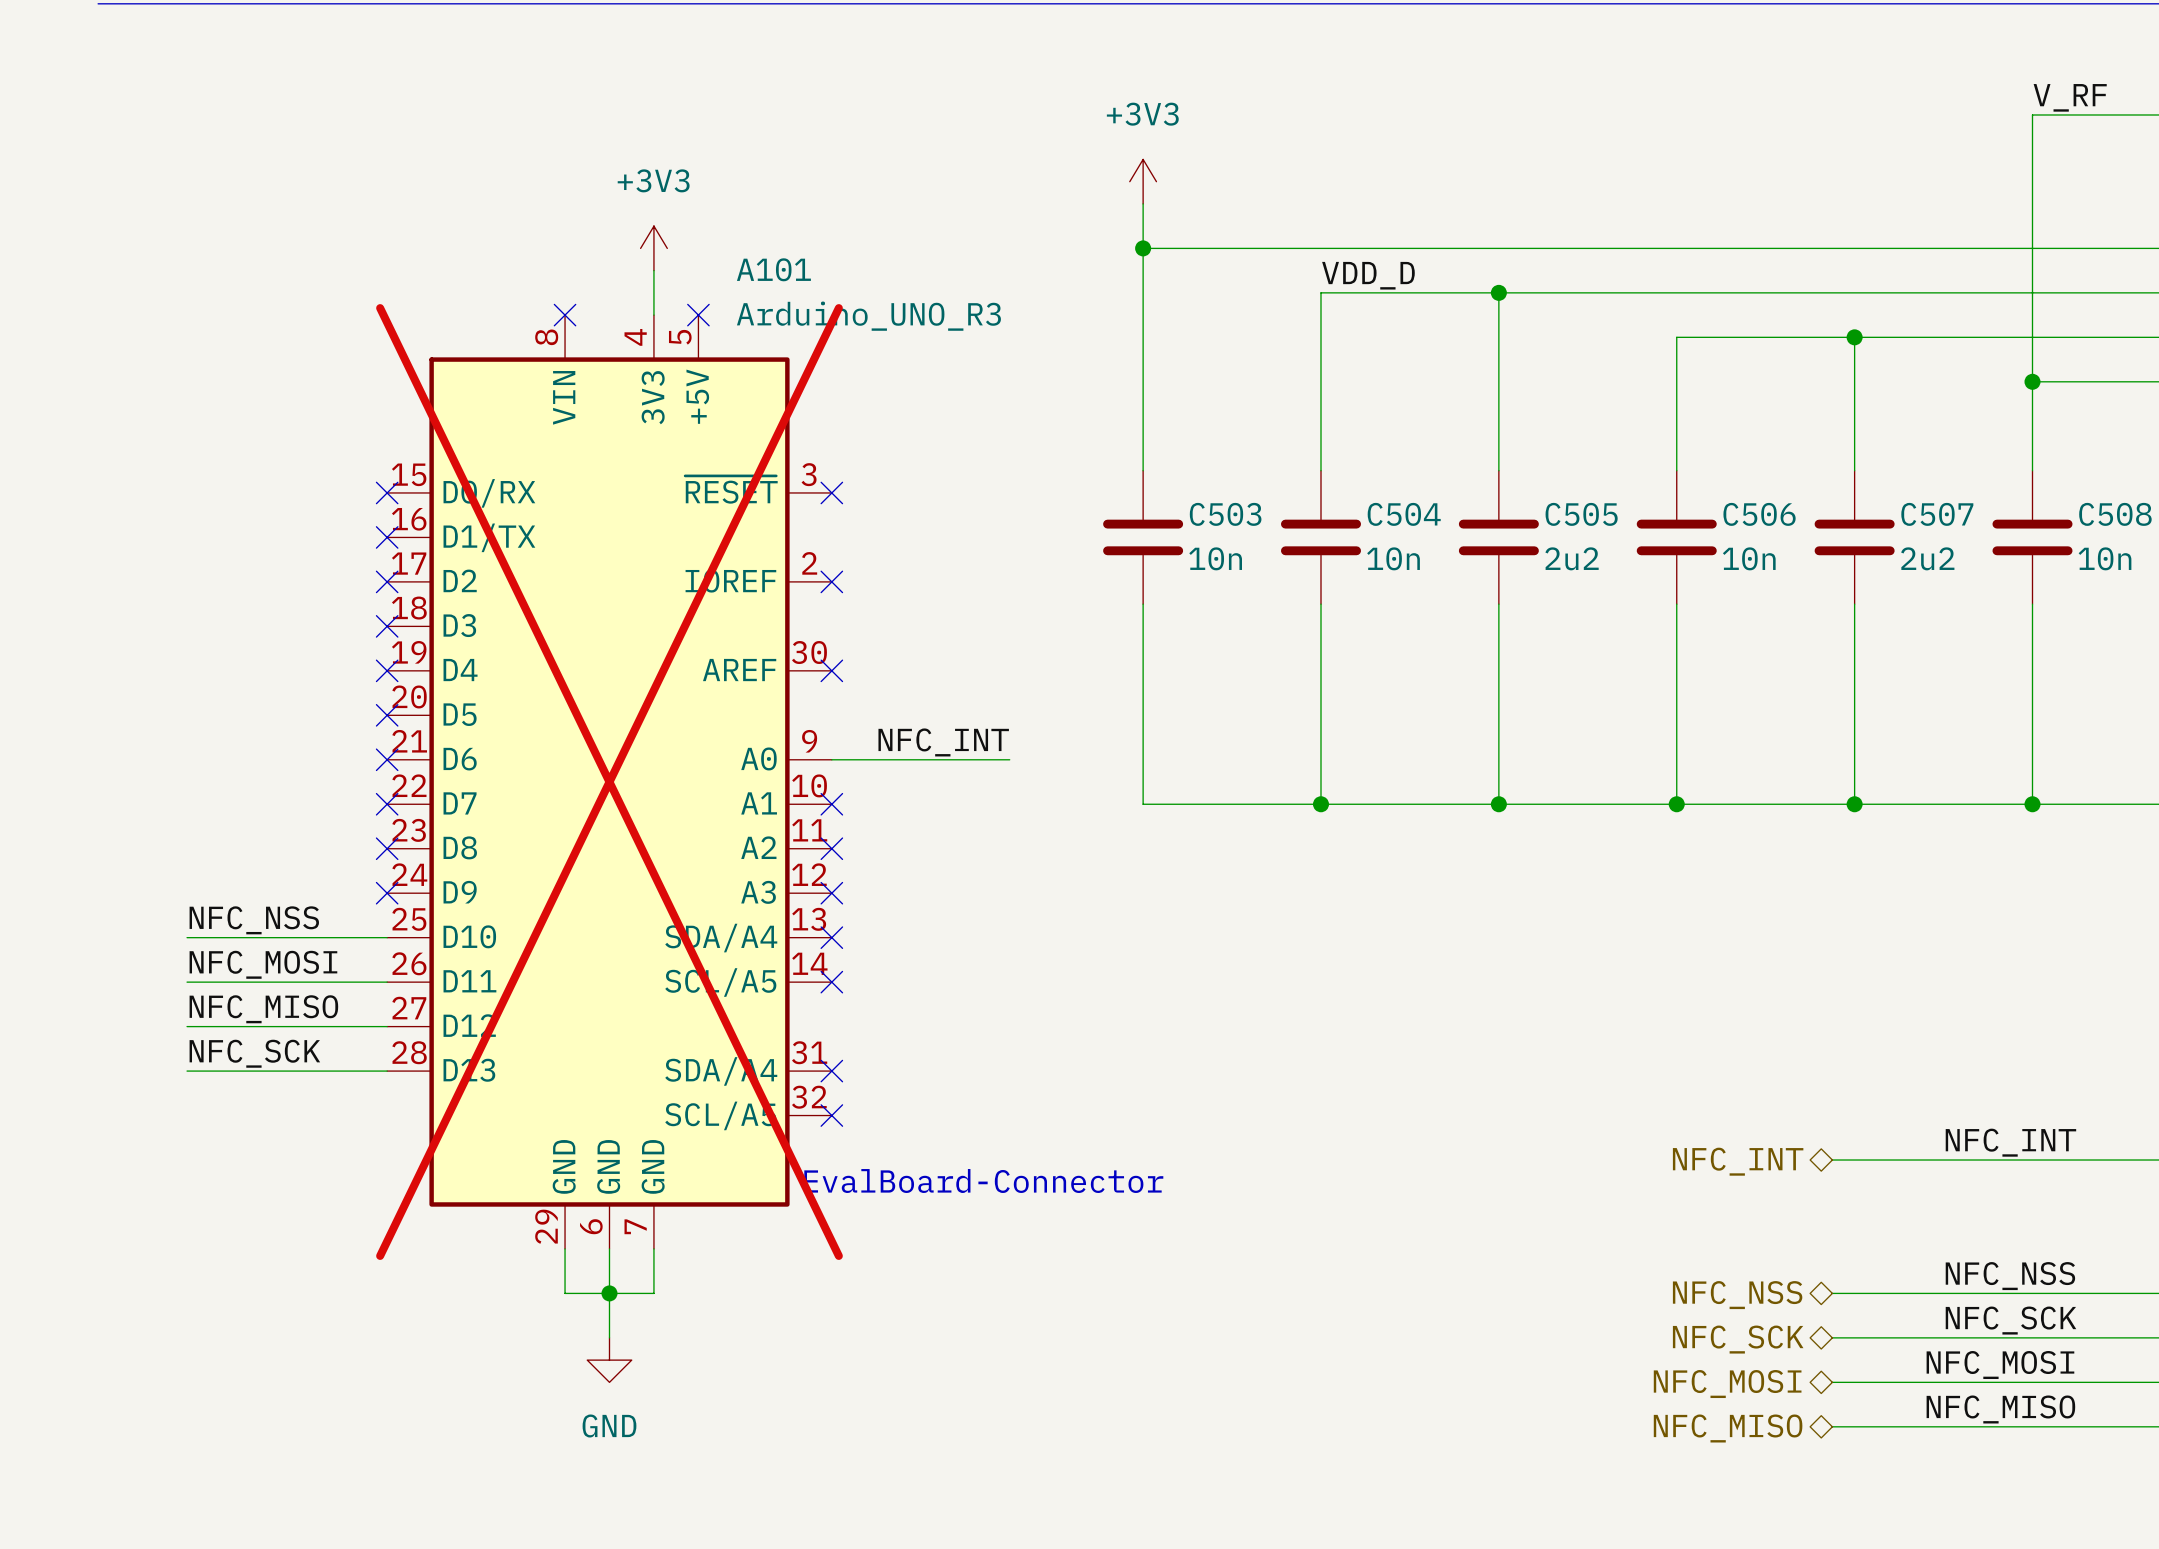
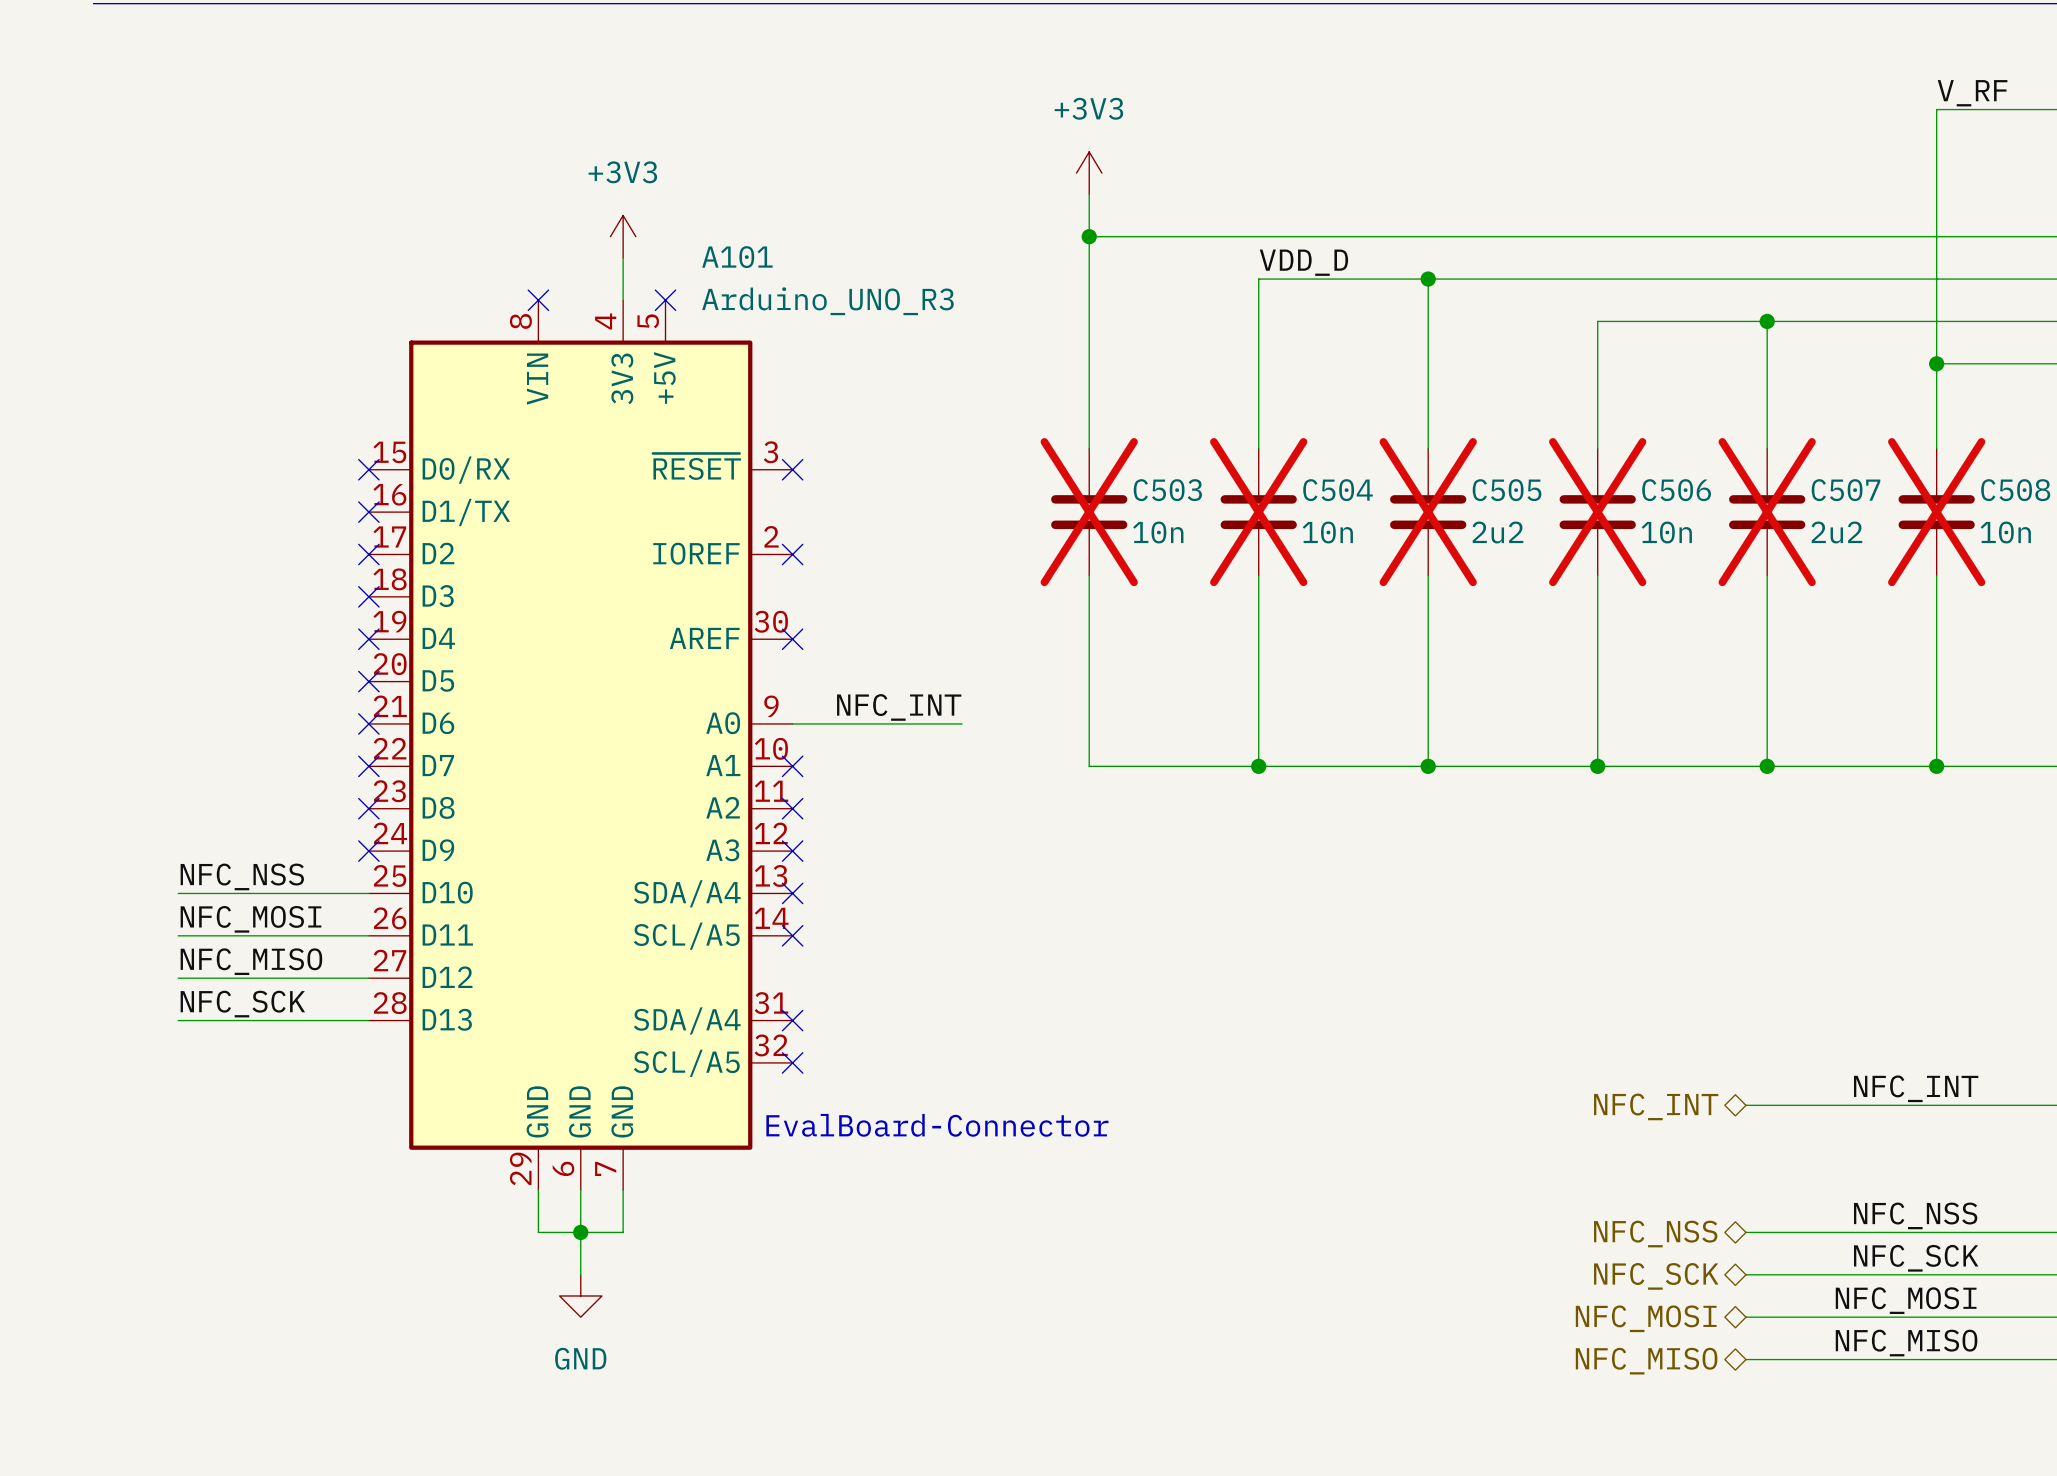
C503 do-not-place cross: none -> (1089, 512)
C504 do-not-place cross: none -> (1258, 512)
C505 do-not-place cross: none -> (1428, 512)
C506 do-not-place cross: none -> (1597, 512)
C507 do-not-place cross: none -> (1767, 512)
C508 do-not-place cross: none -> (1936, 512)
A101 do-not-place cross: (609, 782) -> none

